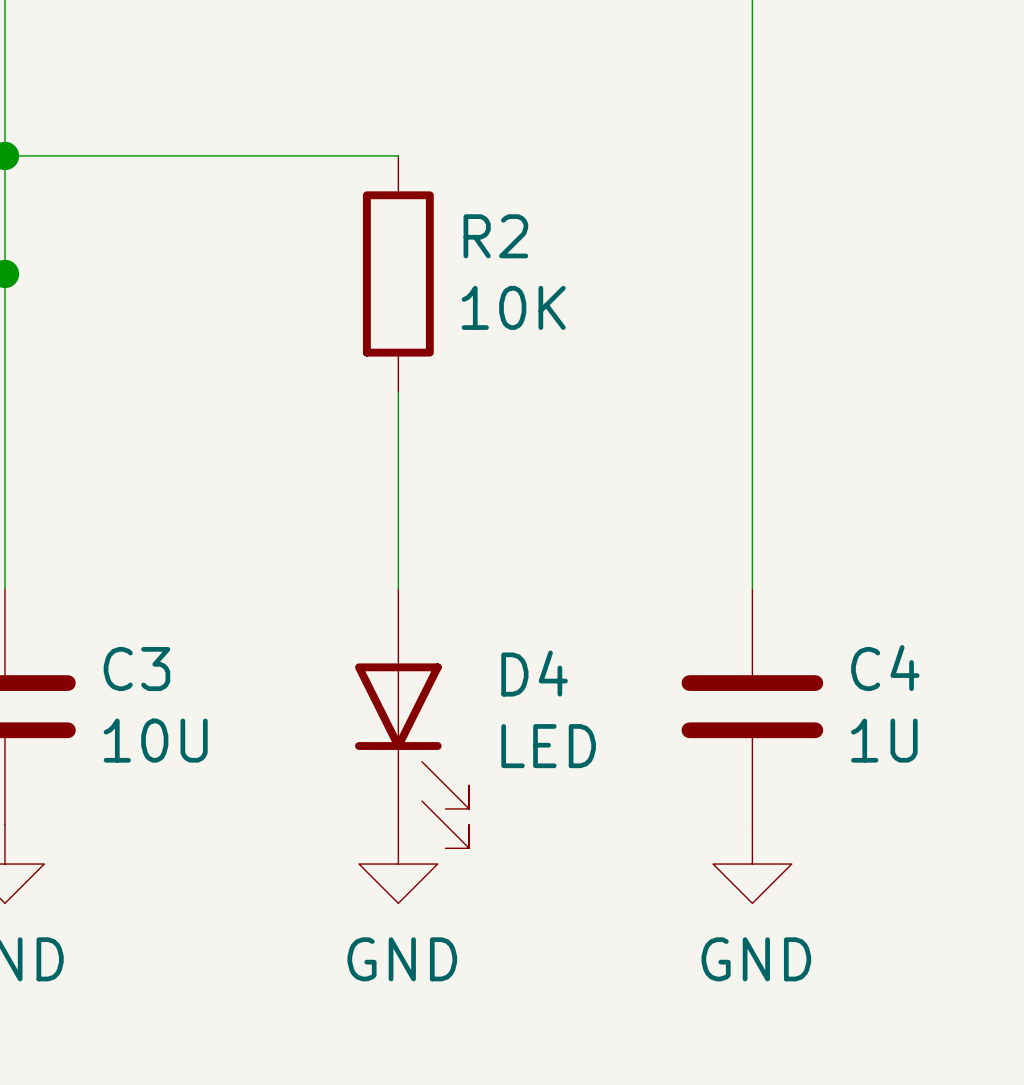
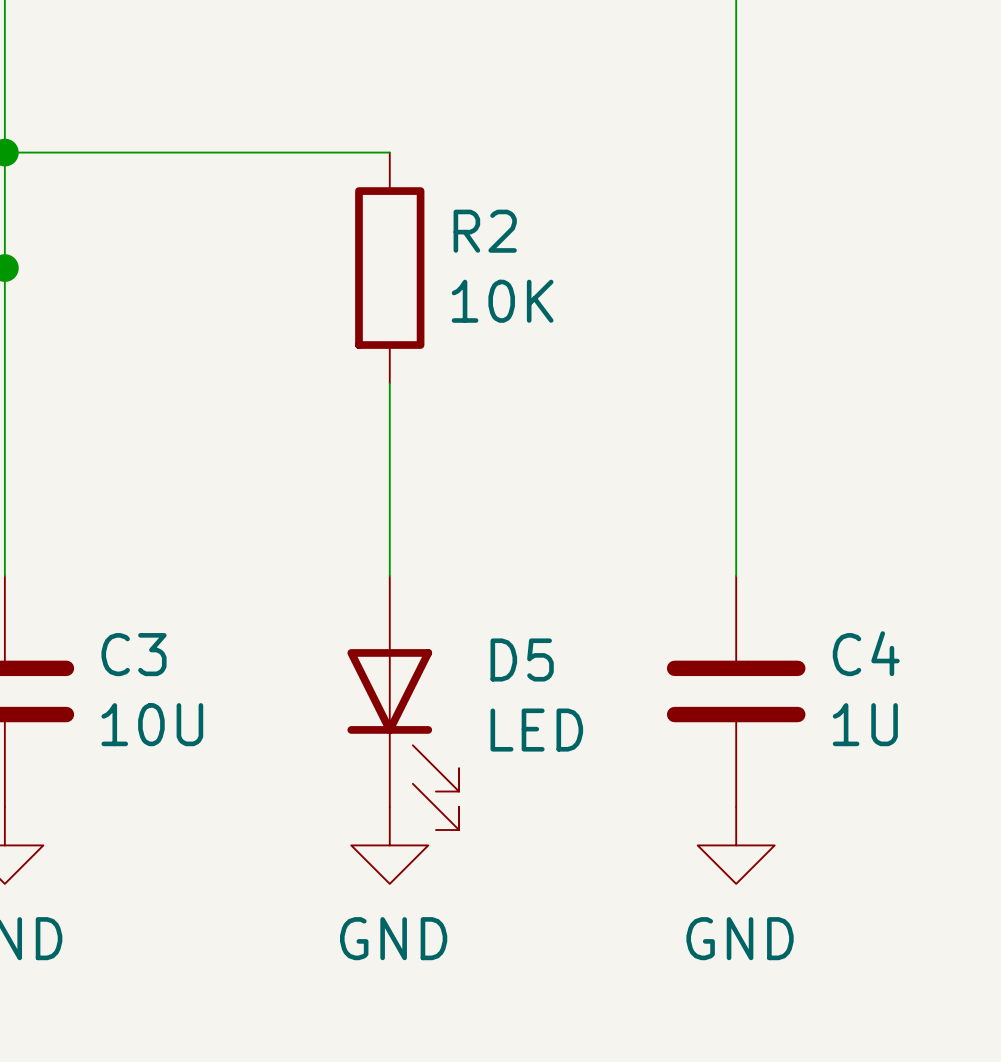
D4 name: D4 (534, 673) -> D5 (522, 659)

